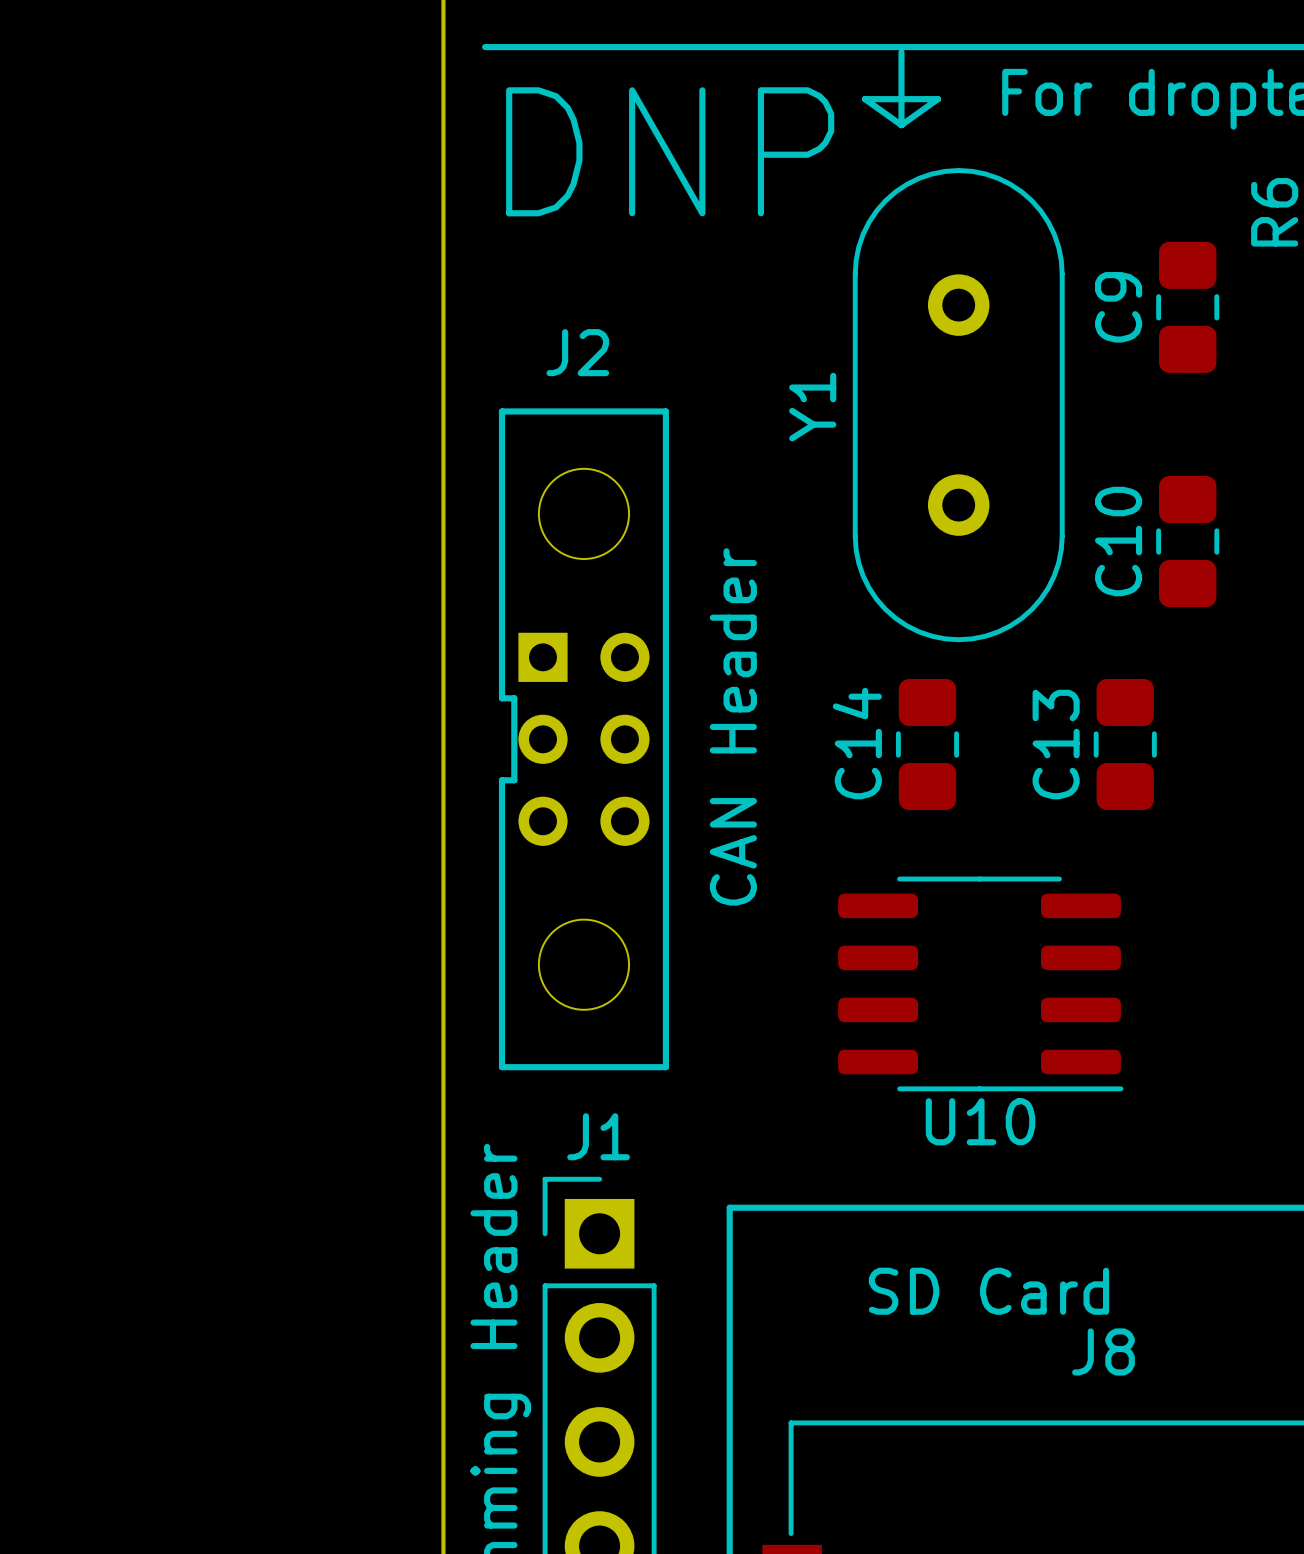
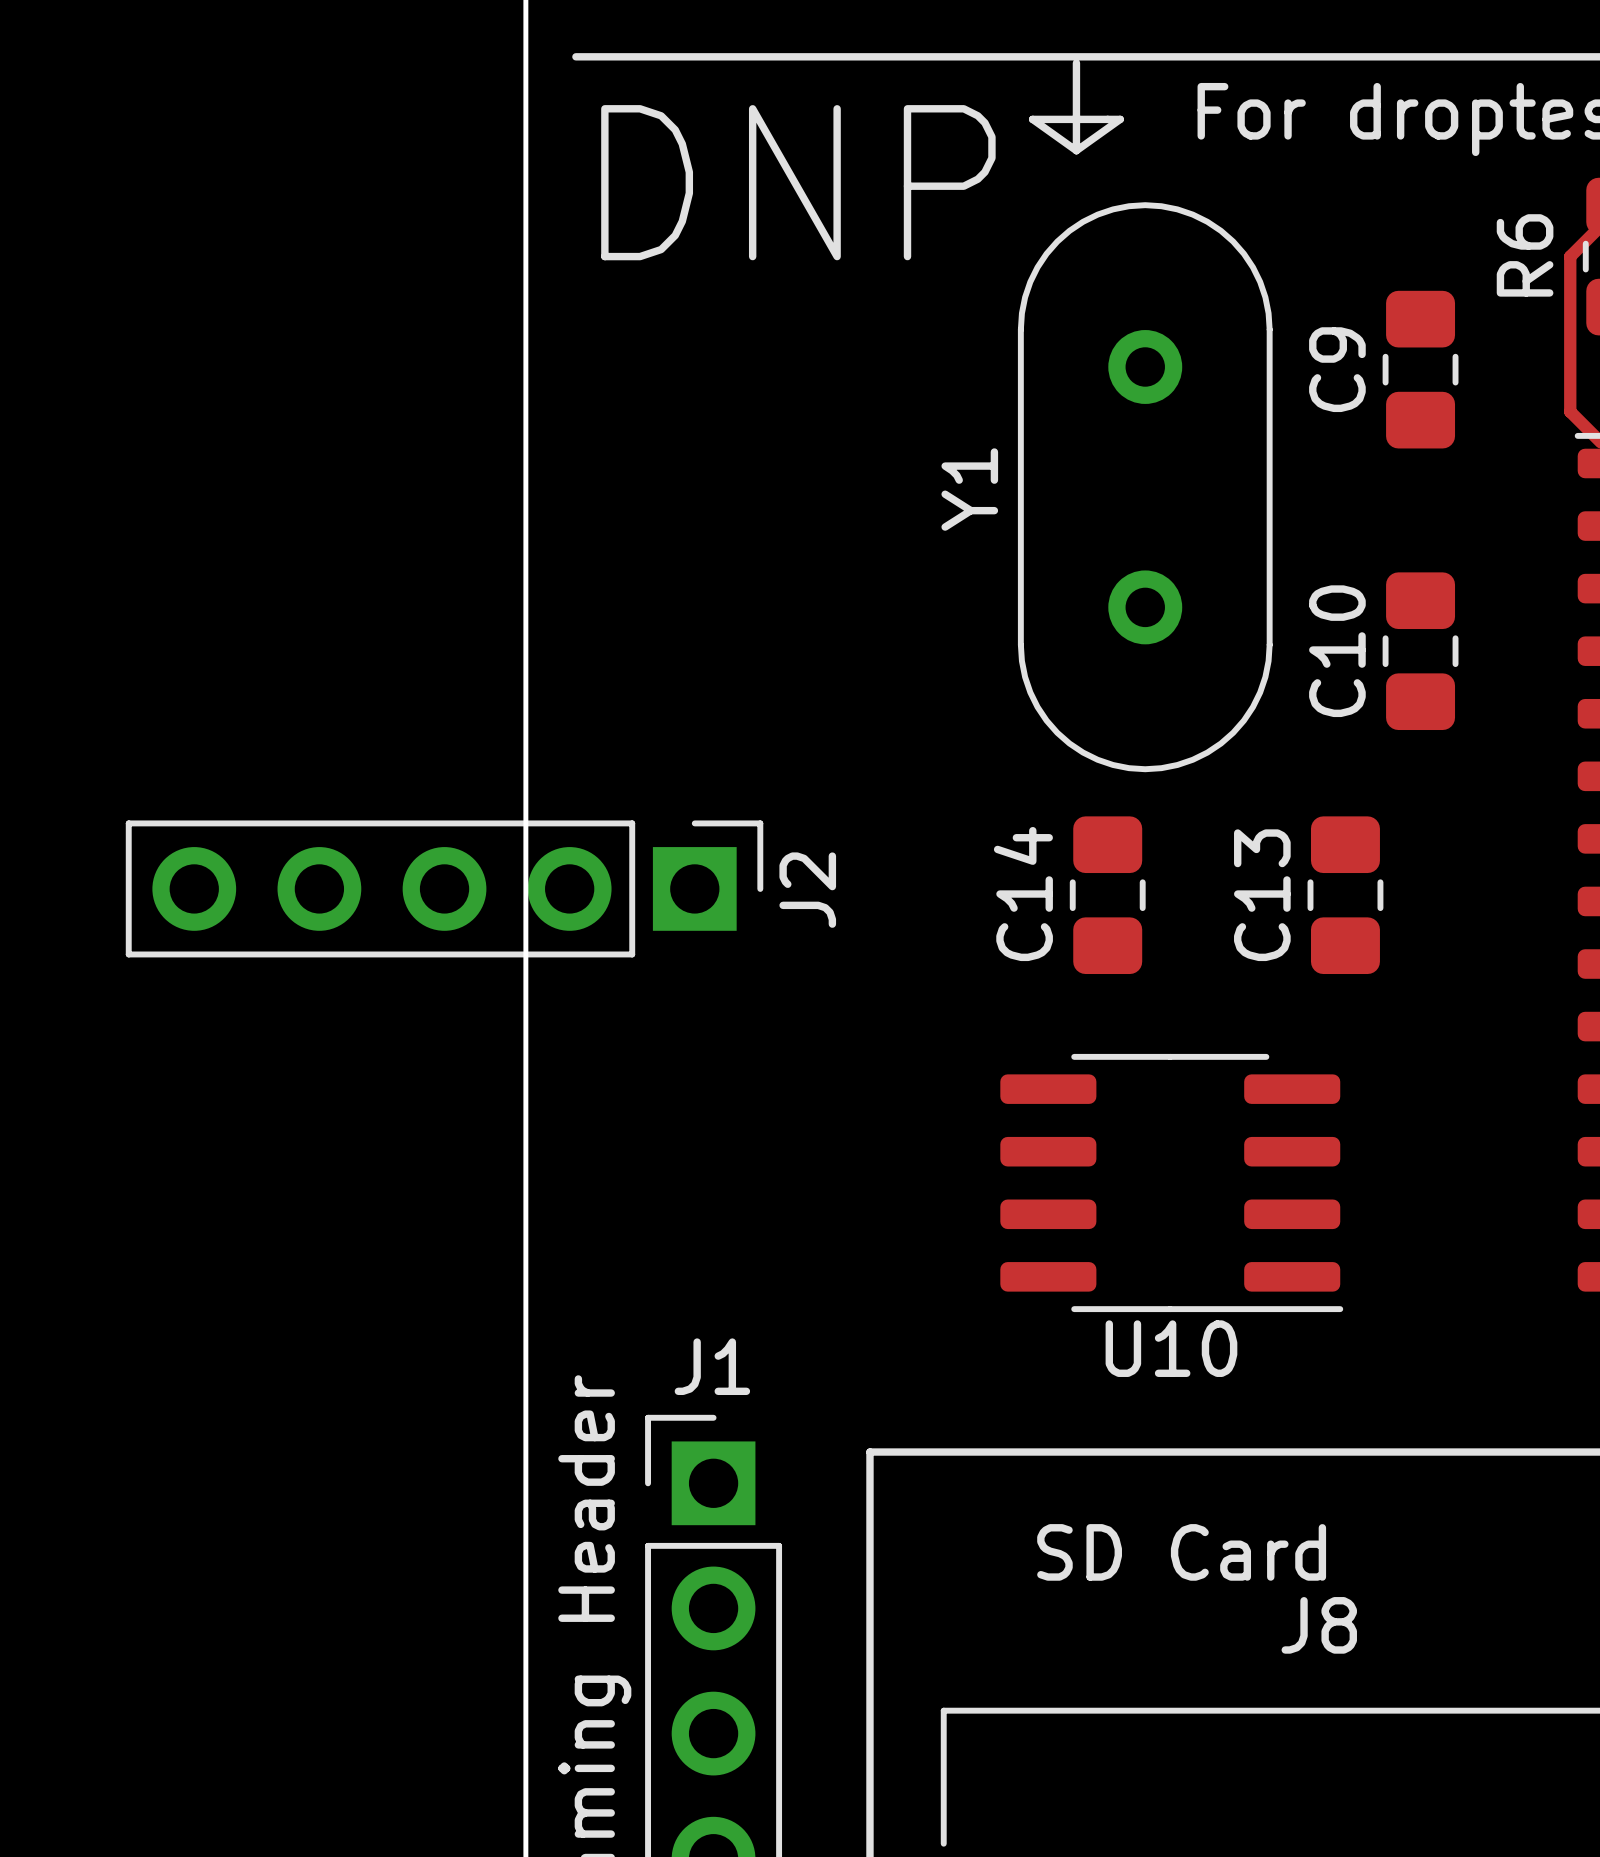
J2 name position: J2 (577, 352) -> J2 (807, 890)
J2 footprint: [498, 408, 670, 1071] -> [125, 820, 764, 958]
J2 value: CAN Header (733, 726) -> none

